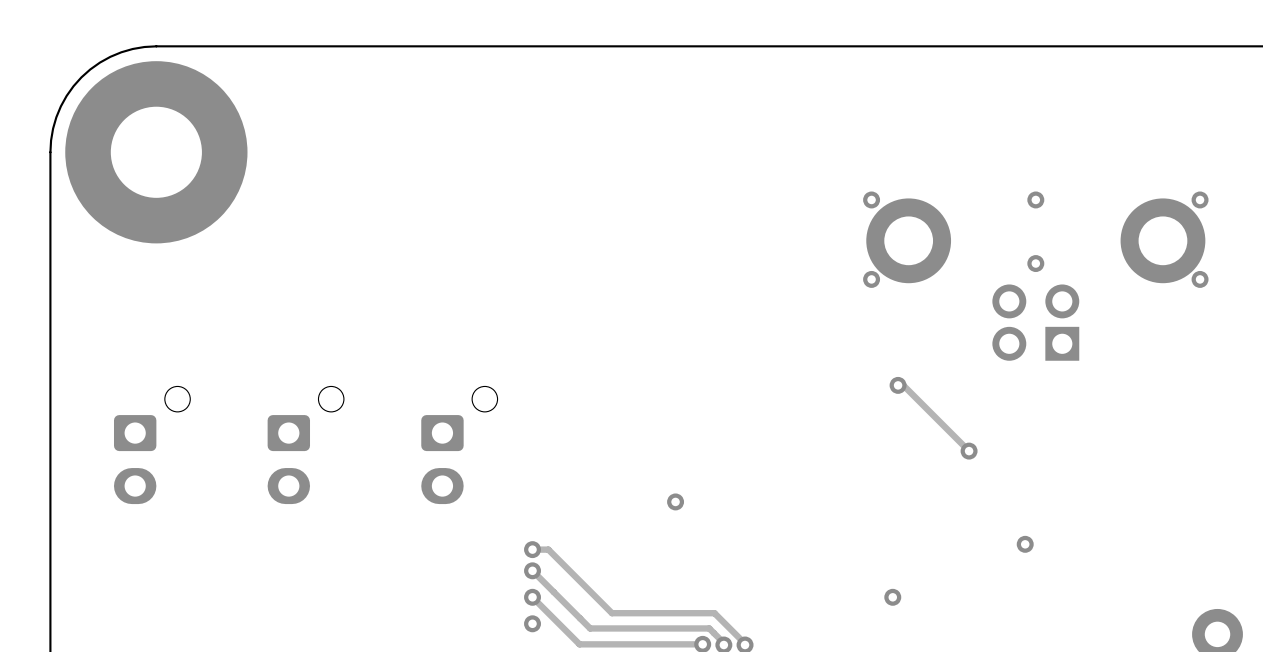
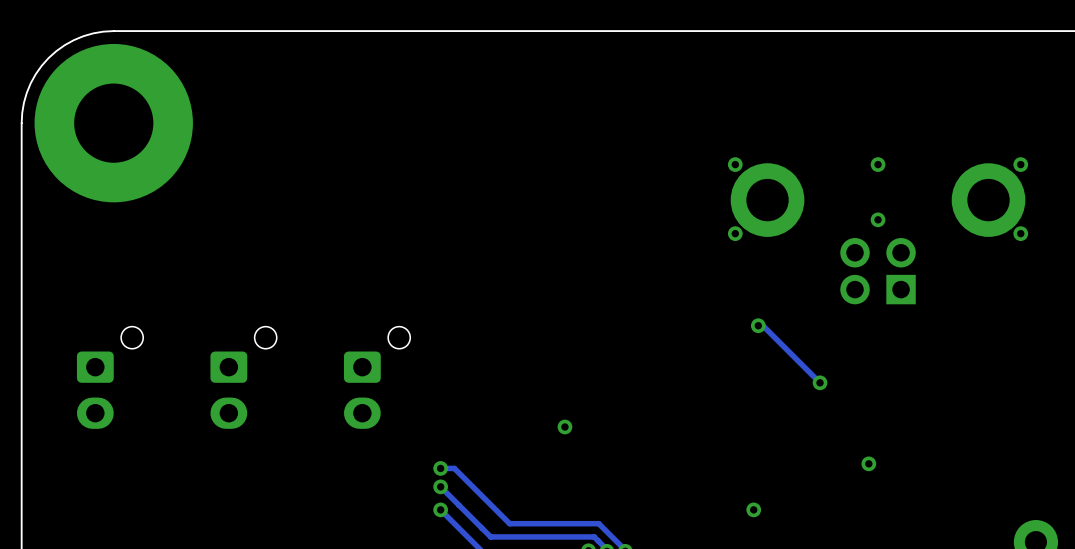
via: (532, 623) -> none

